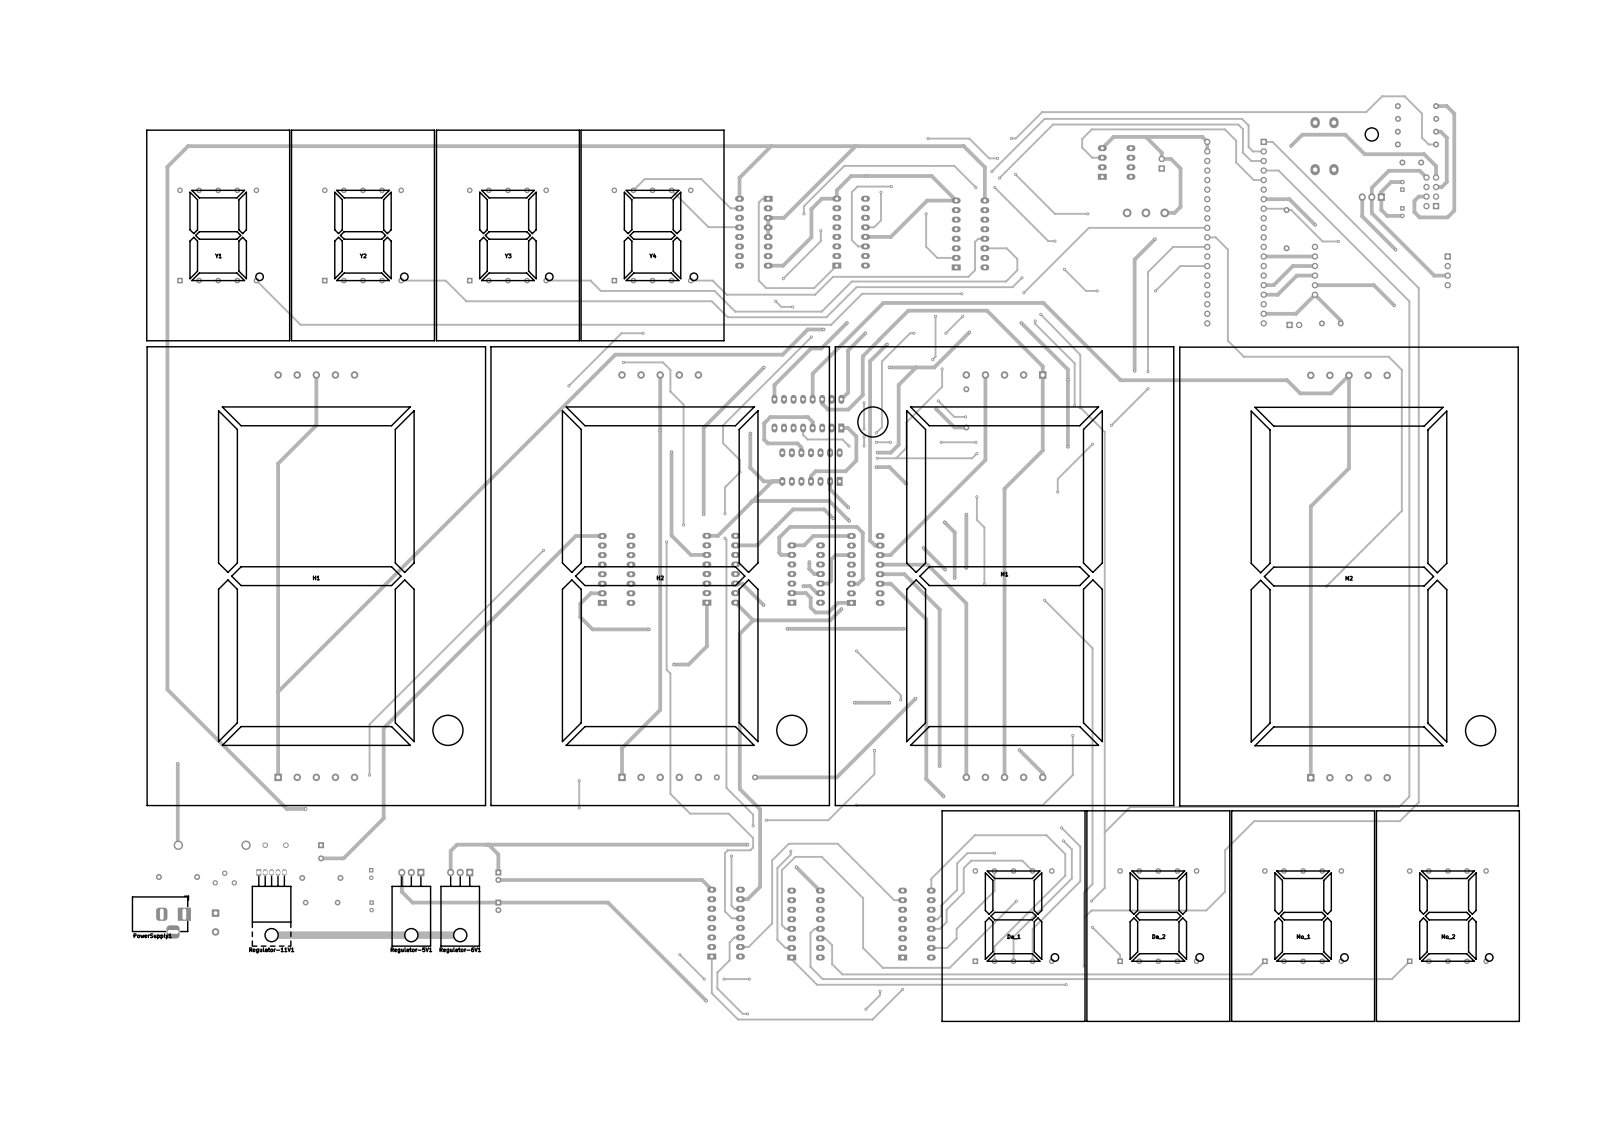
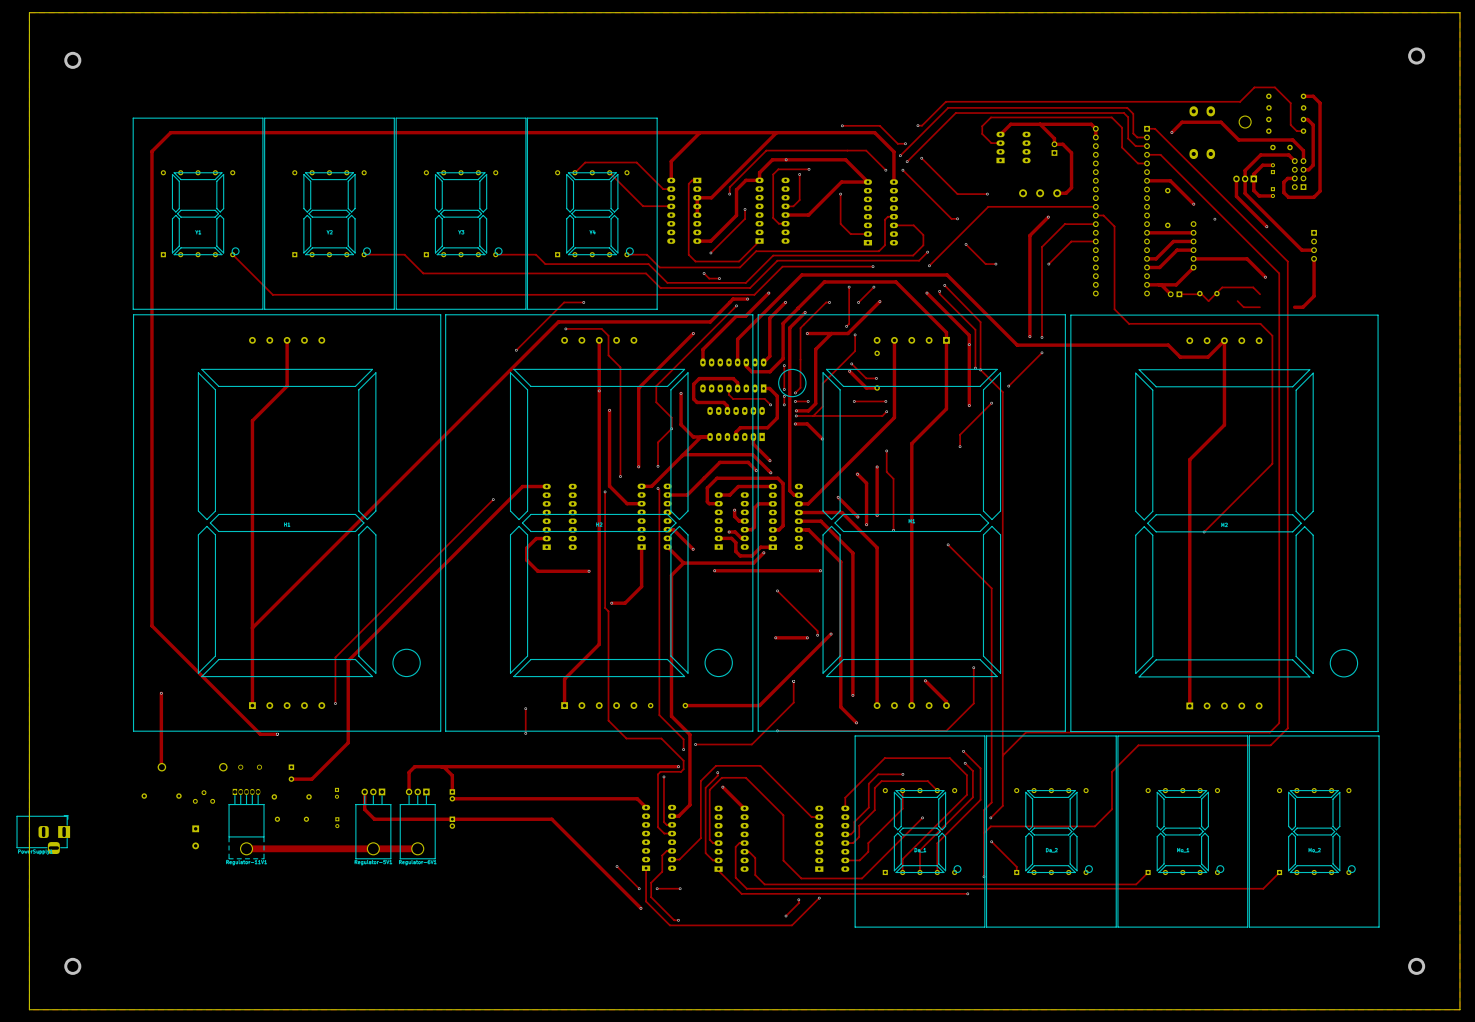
board edge: none -> (29, 12) (1459, 12) (1459, 1009) (29, 1009) (29, 12)
via: none -> (1416, 56)
via: none -> (72, 60)
track: (1263, 208) (1291, 210) (1322, 241) (1338, 241) -> none
track: none -> (1314, 258) (1314, 296) (1302, 307) (1294, 307)
track: (1314, 294) (1340, 320) (1340, 323) -> none
track: none -> (1161, 284) (1170, 294)
part rotation: 0° (1294, 324) -> 180° (1175, 294)
track: none -> (1179, 294) (1201, 294) (1208, 301) (1222, 287) (1253, 287) (1260, 294)
track: none -> (1237, 301) (1243, 307) (1259, 307)
part position: (161, 917) -> (43, 834)
via: none -> (72, 966)
via: none -> (1416, 966)

